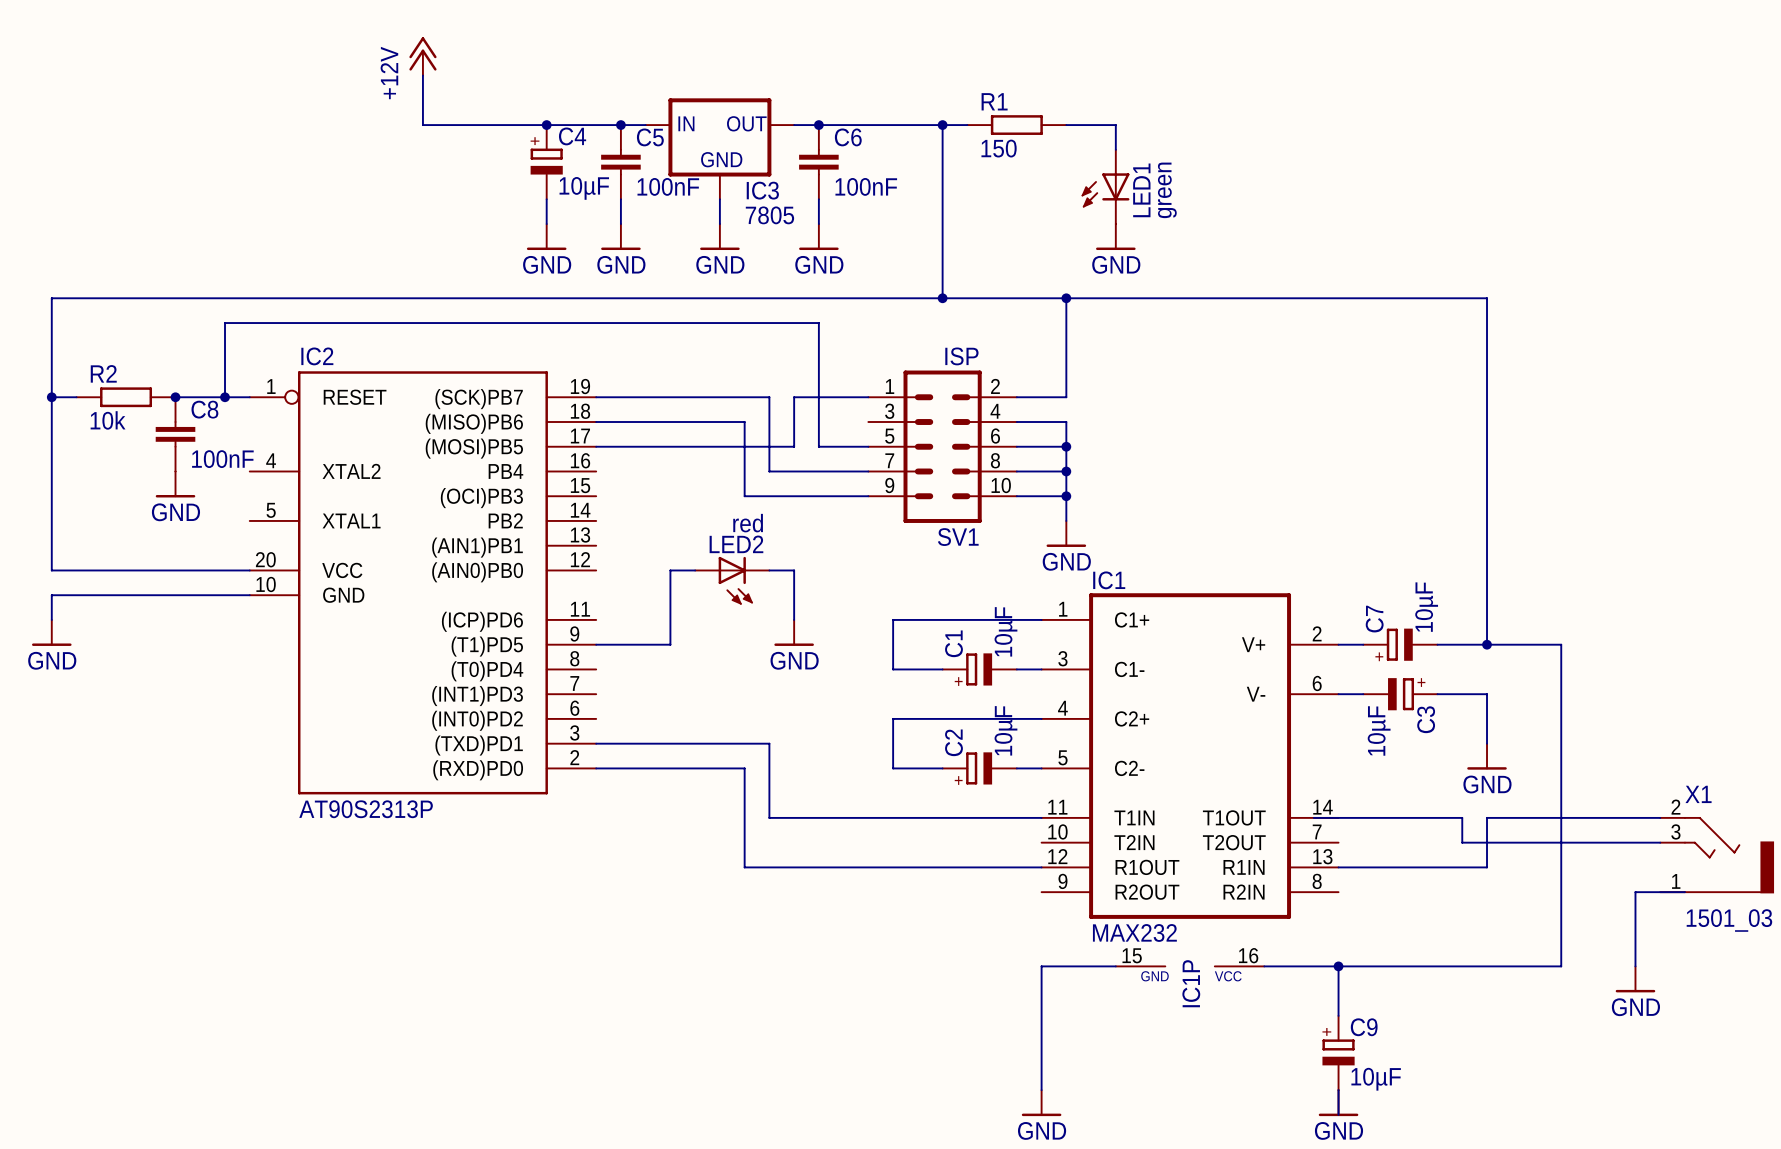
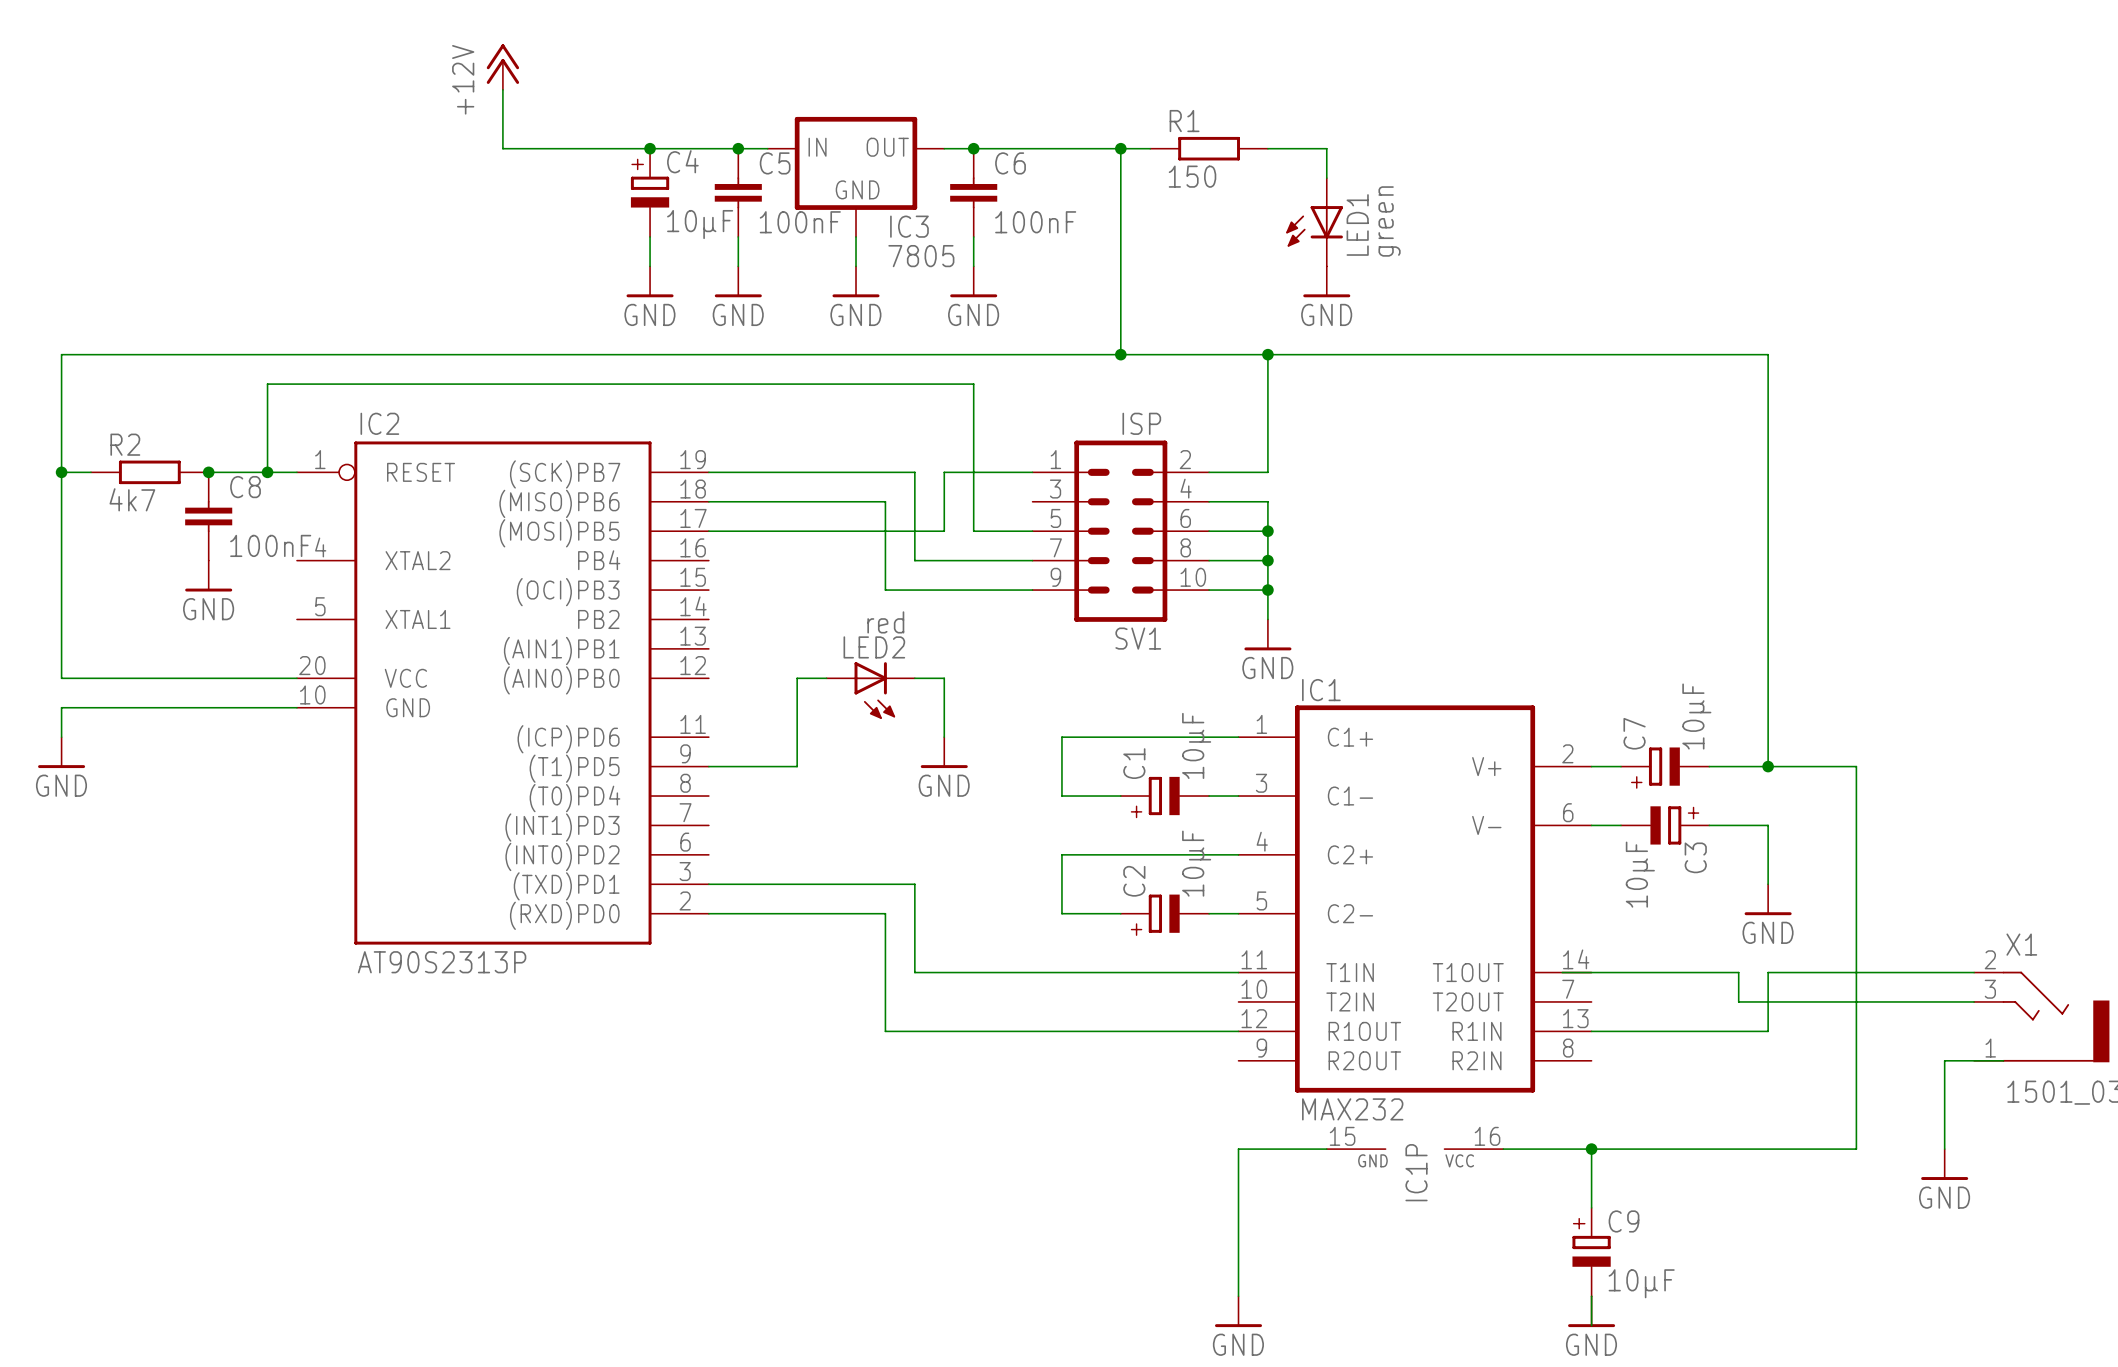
R2 value: 10k (108, 420) -> 4k7 (132, 499)

